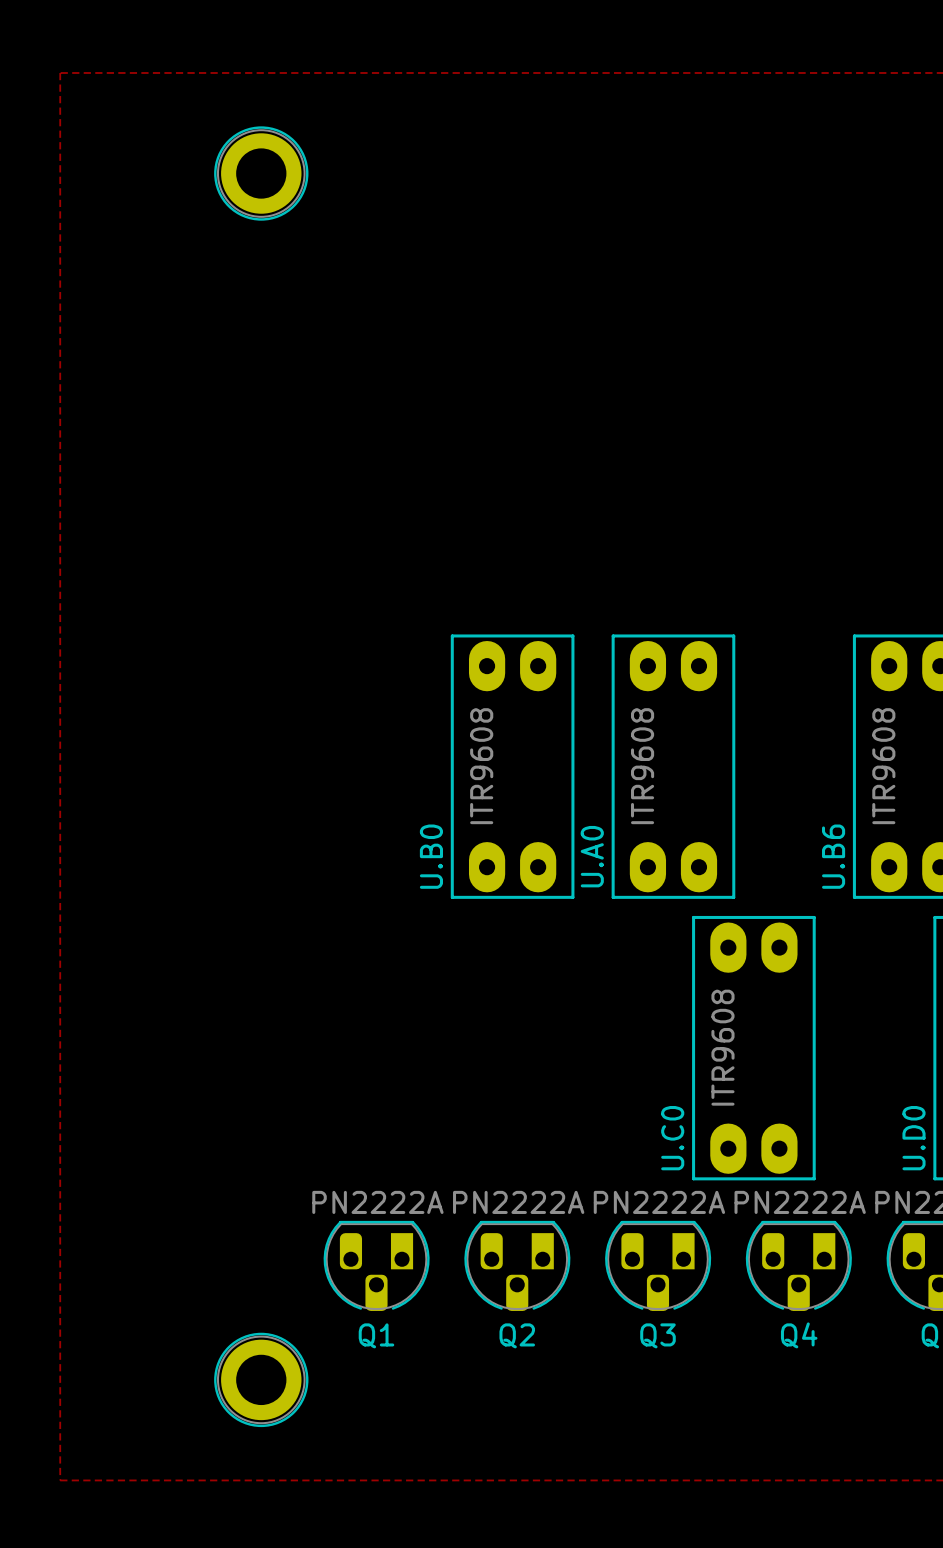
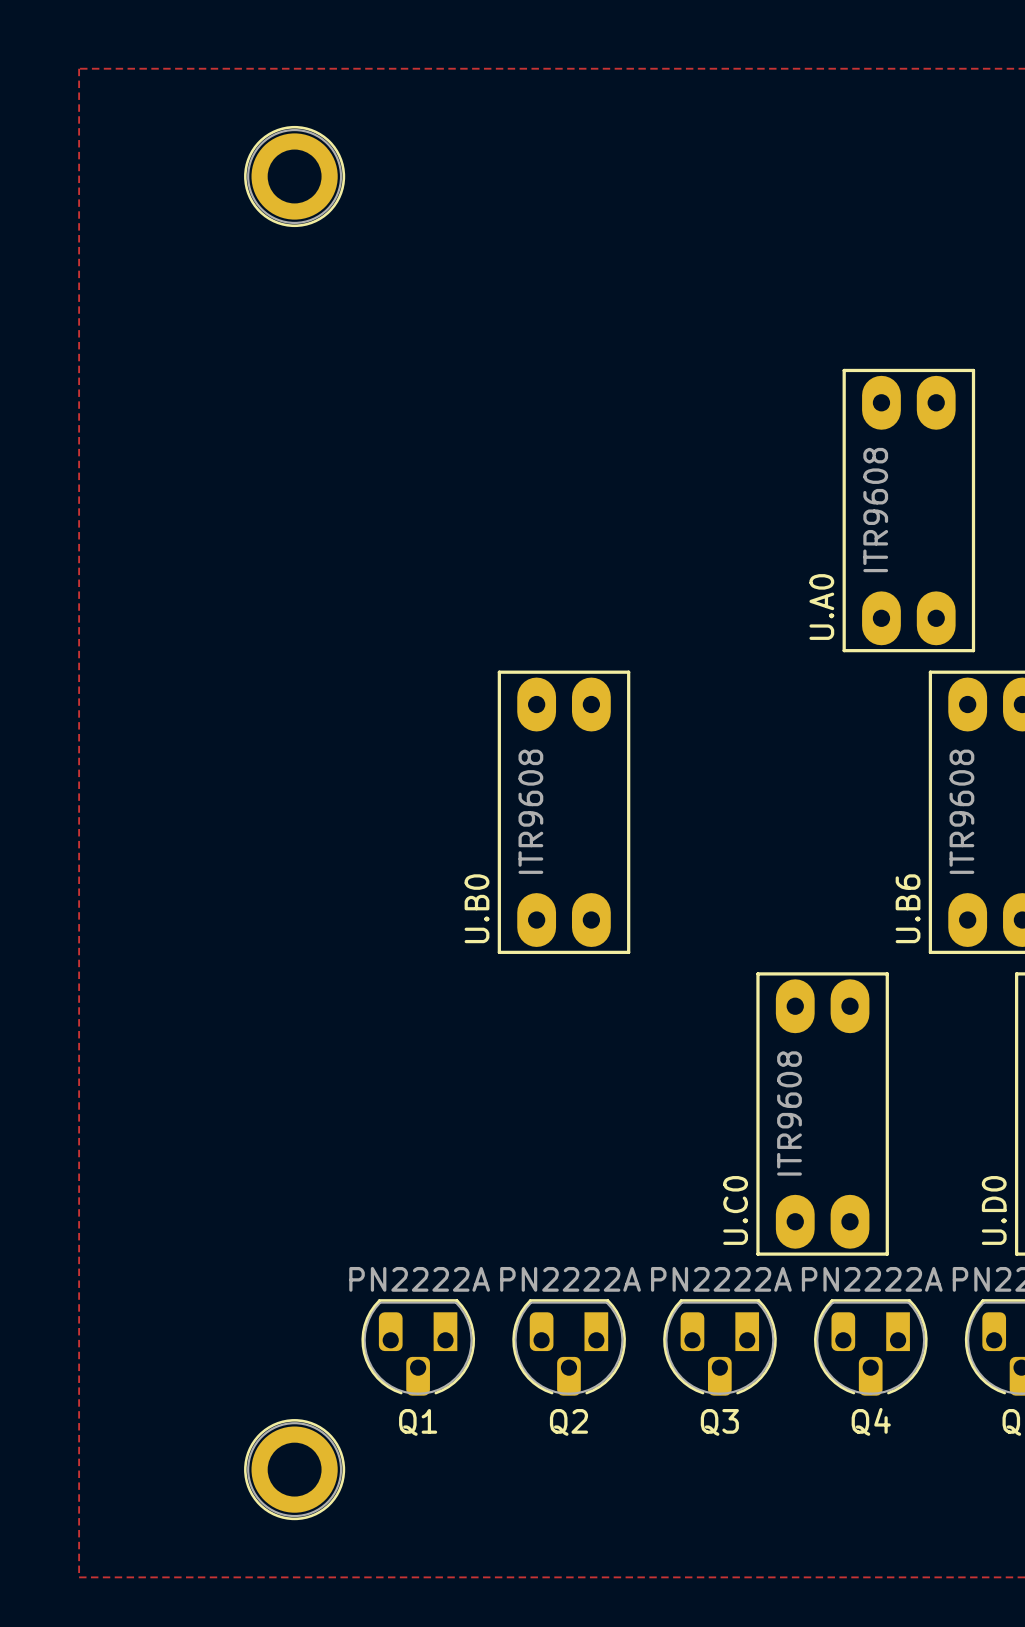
U.A0 position: (673, 766) -> (908, 510)

